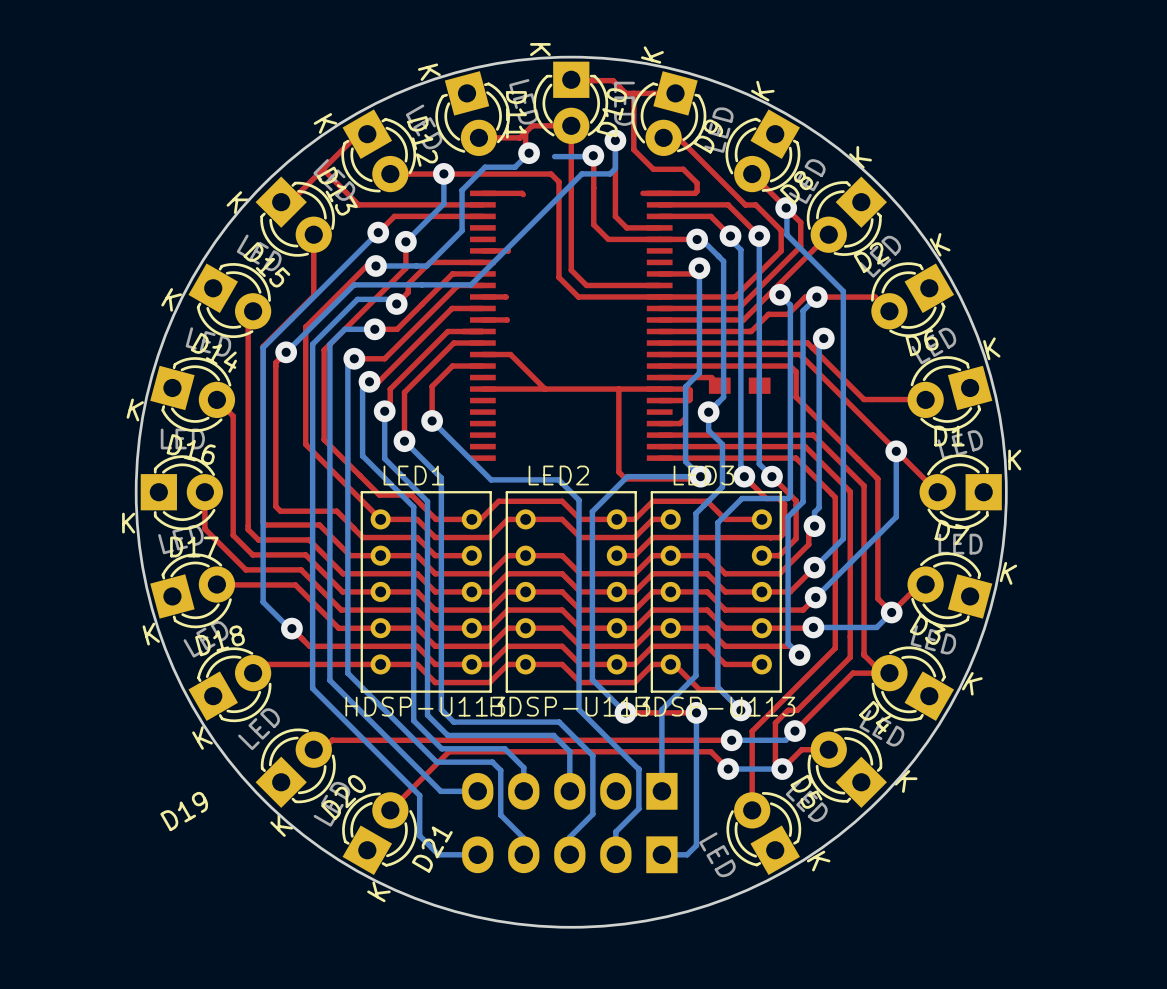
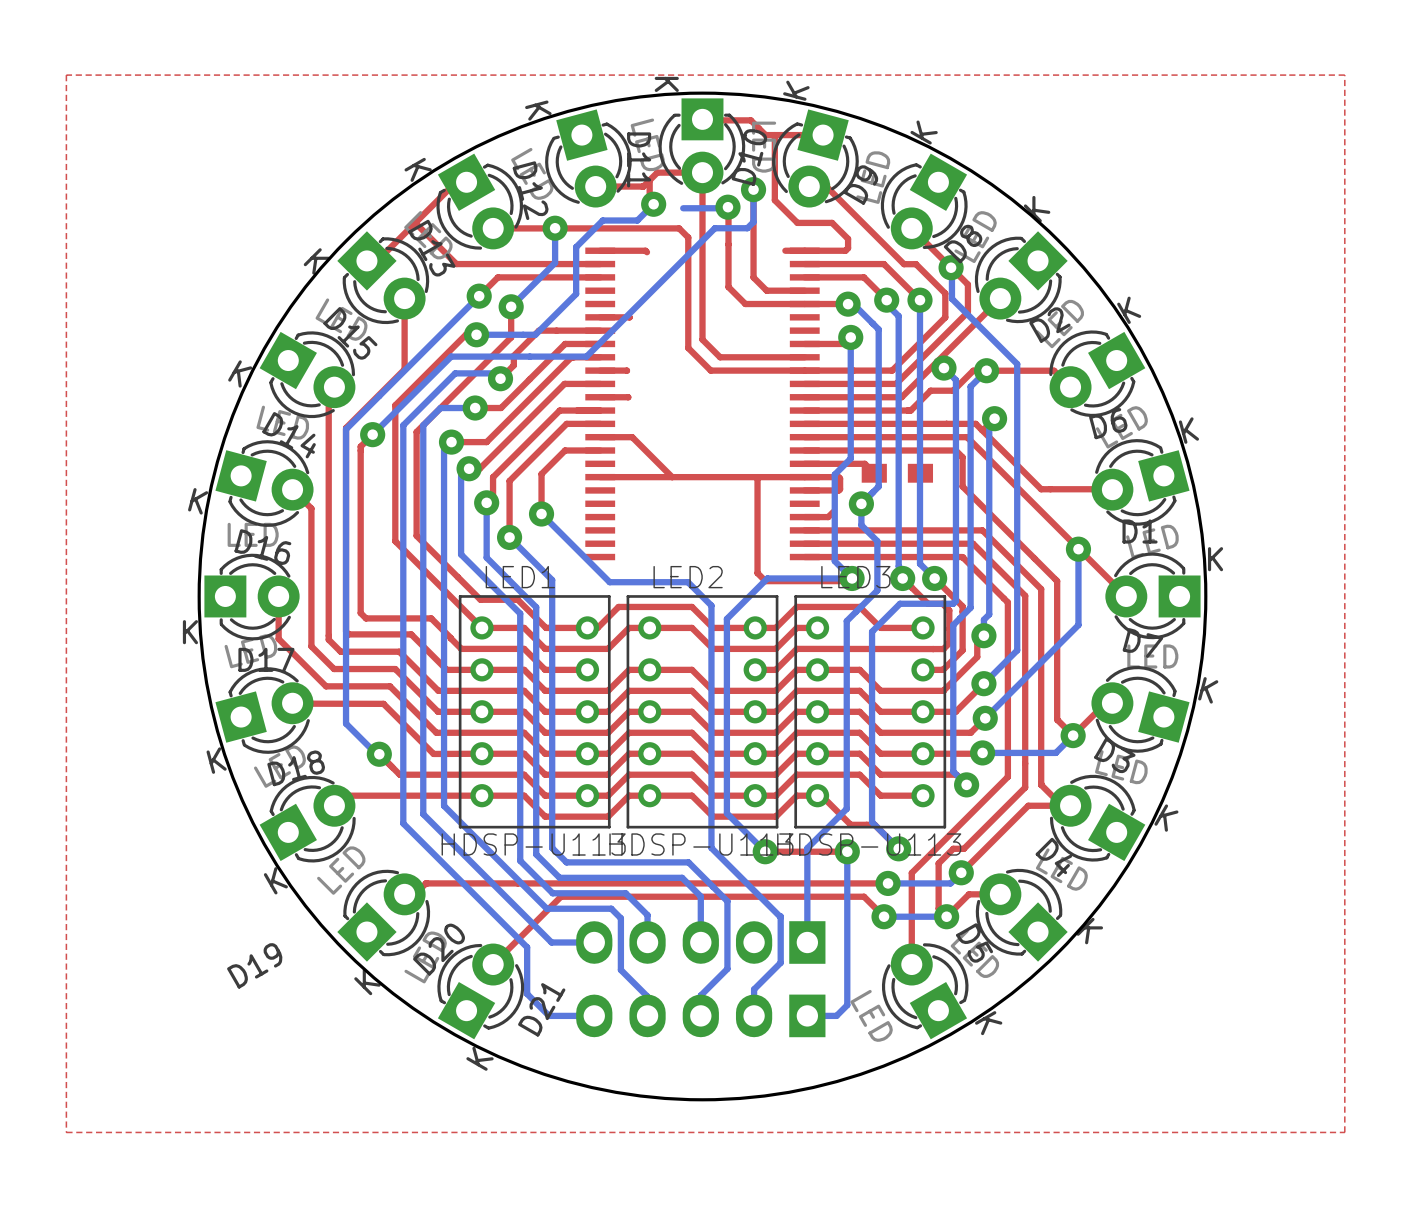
top zone outline: none -> (1344, 75) (66, 75) (66, 1132) (1344, 1132) (1344, 75)

